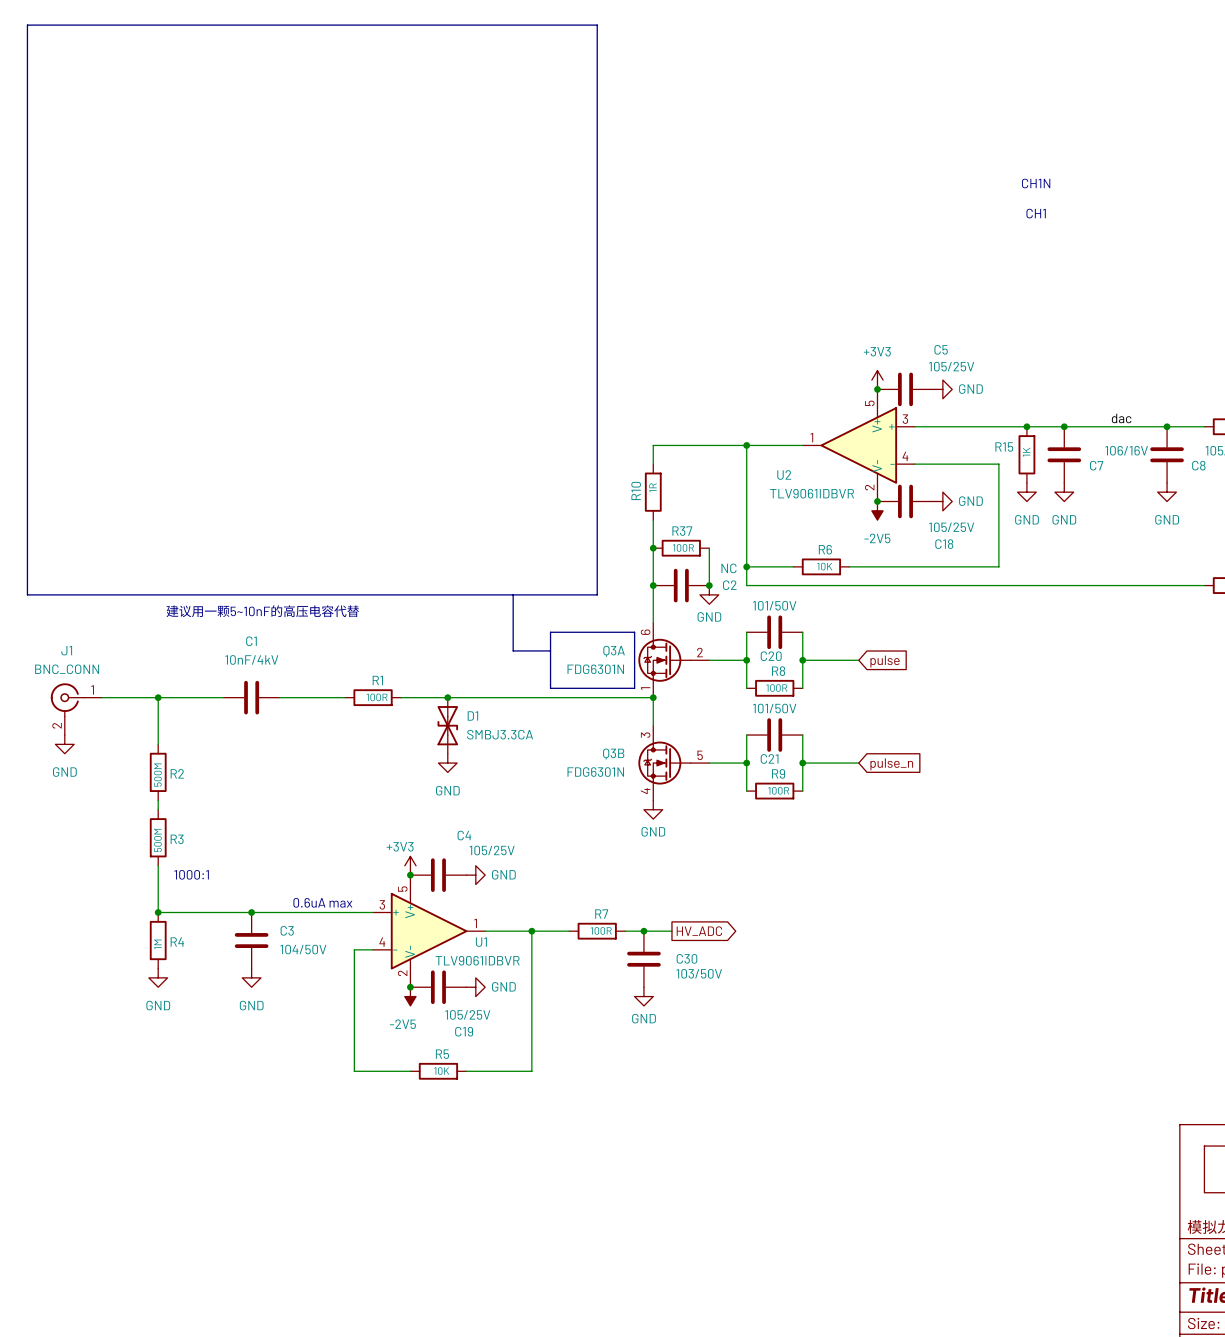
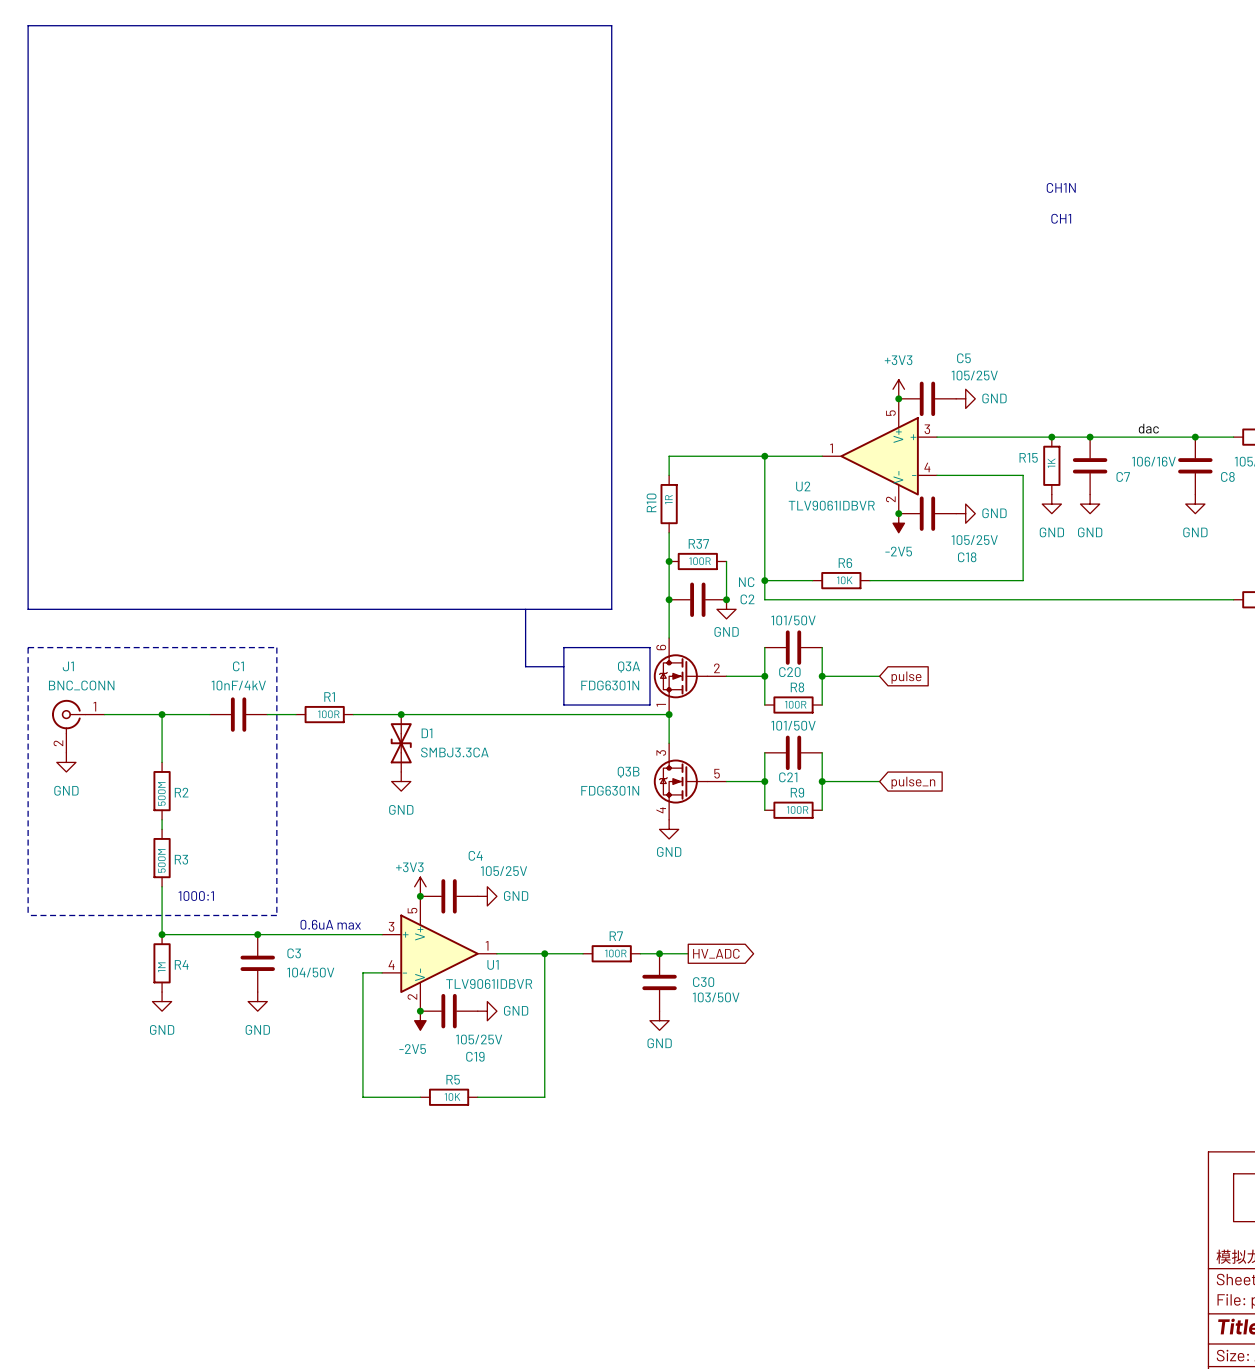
text: 建议用一颗5~10nF的高压电容代替 (262, 611) -> none
line: none -> (28, 647) (28, 915) (276, 915) (276, 647) (28, 647)
C1 name position: C1 (251, 641) -> C1 (238, 666)
C1 value position: 10nF/4kV (251, 659) -> 10nF/4kV (238, 685)
J1 value position: BNC_CONN (67, 669) -> BNC_CONN (81, 685)
C1 position: (251, 697) -> (238, 714)
wire: (288, 697) (345, 697) -> (410, 714) (353, 714)
R1 position: (373, 697) -> (324, 714)
junction: none -> (401, 714)
junction: (447, 697) -> none
D1 position: (447, 725) -> (401, 743)
power symbol position: GND (447, 763) -> GND (401, 781)

